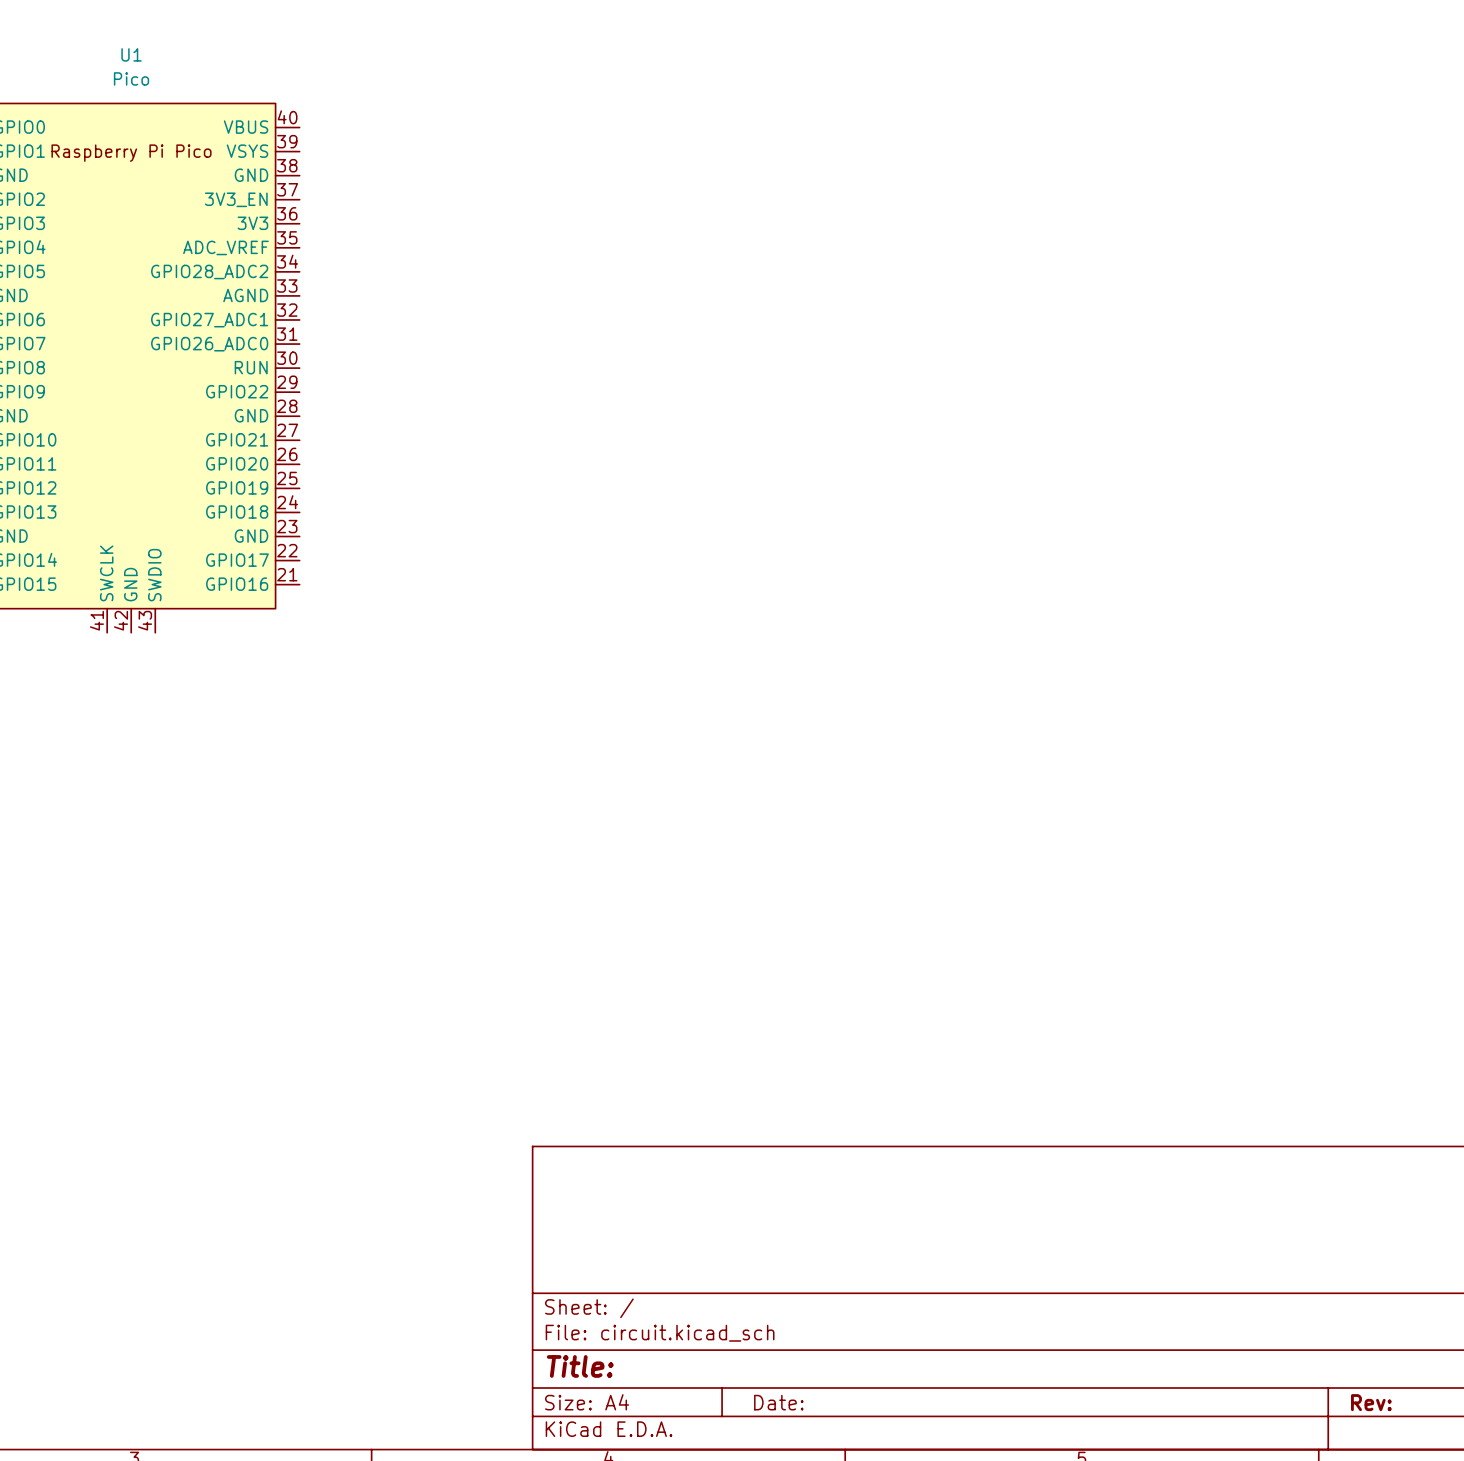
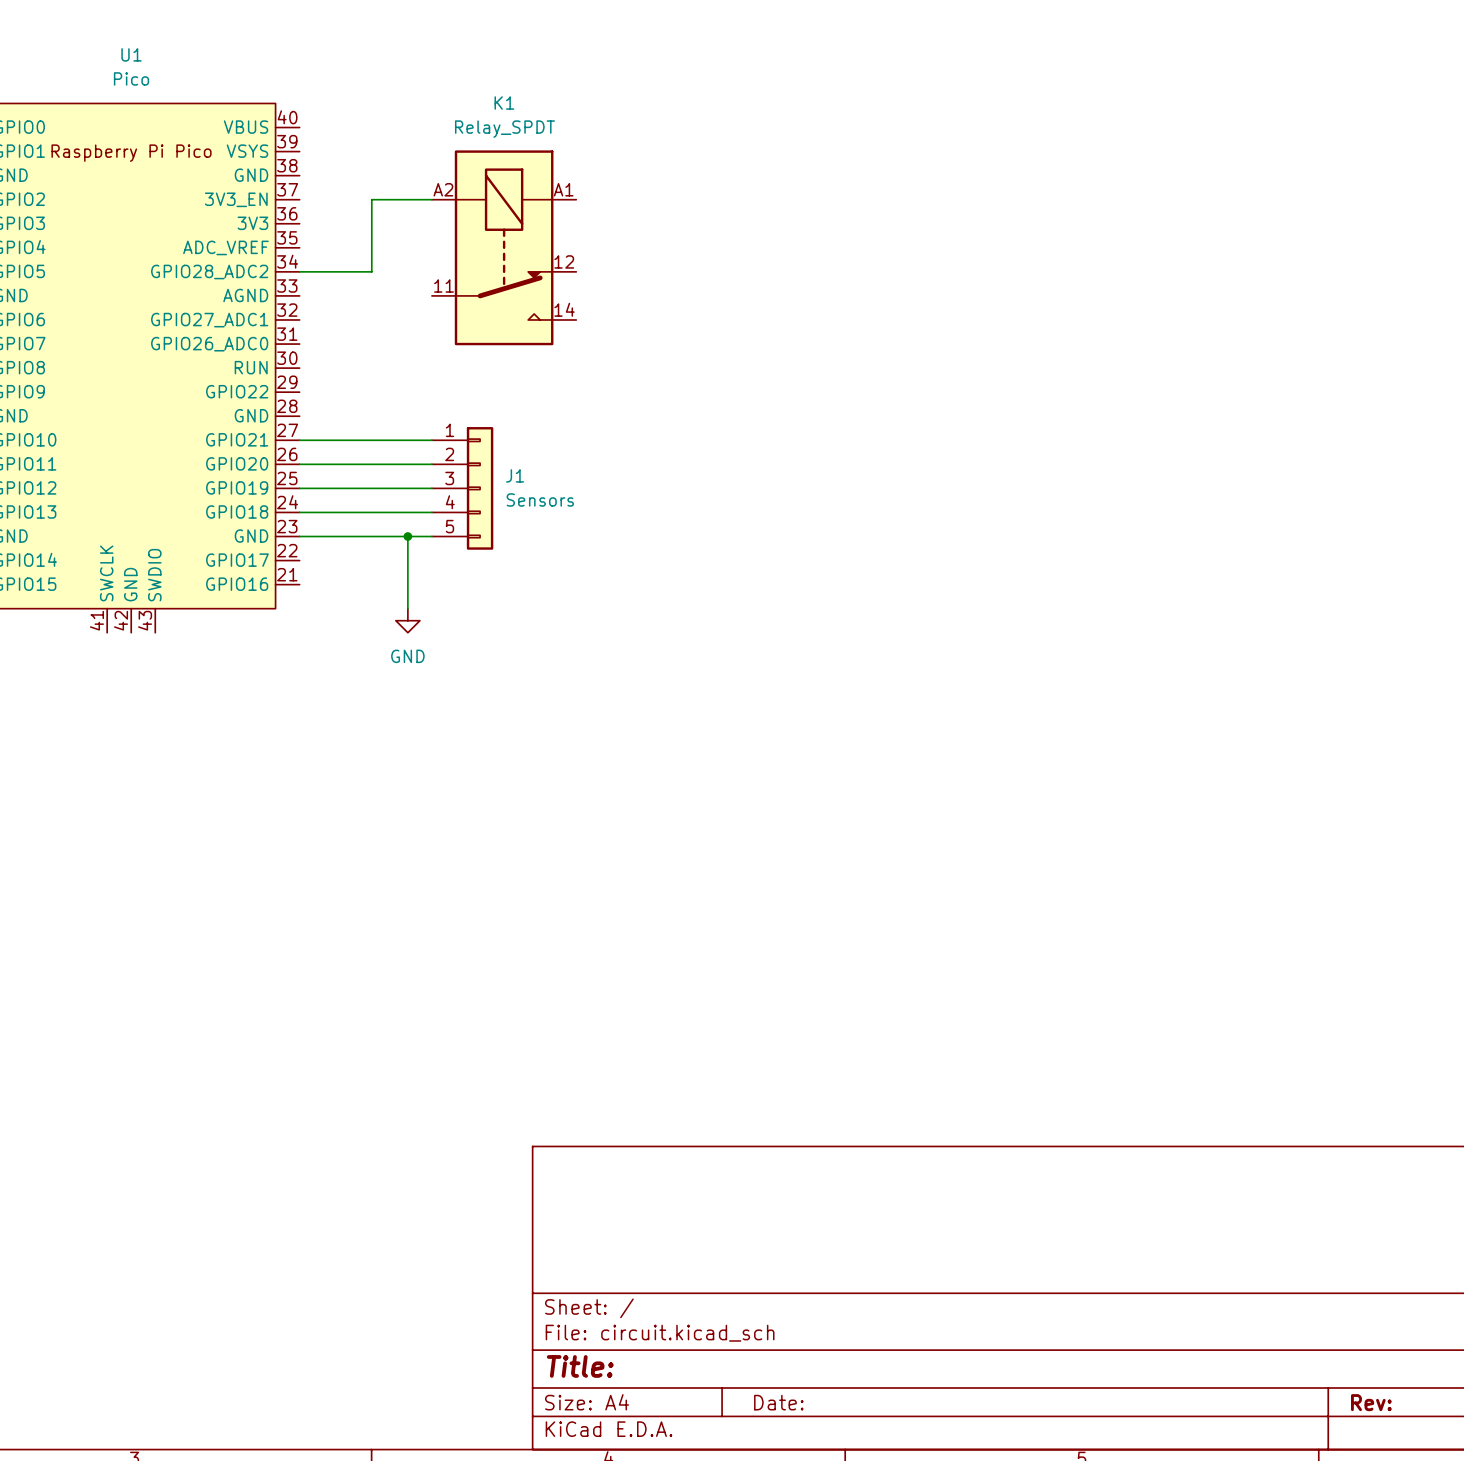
wire: none -> (431, 199) (371, 199) (371, 271) (299, 271)
K1: none -> Relay_SPDT (504, 247)
wire: none -> (299, 440) (431, 440)
wire: none -> (299, 464) (431, 464)
wire: none -> (299, 488) (431, 488)
J1: none -> Sensors (462, 488)
wire: none -> (299, 512) (431, 512)
wire: none -> (299, 536) (431, 536)
wire: none -> (407, 536) (407, 608)
junction: none -> (407, 536)
power symbol: none -> GND (407, 620)

